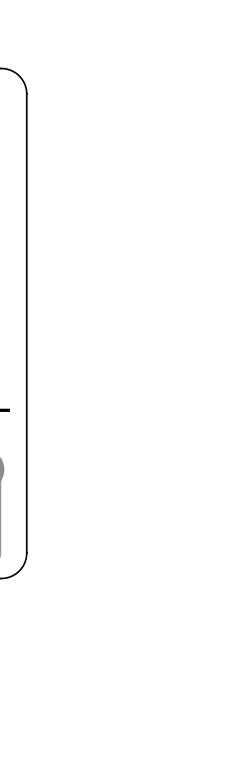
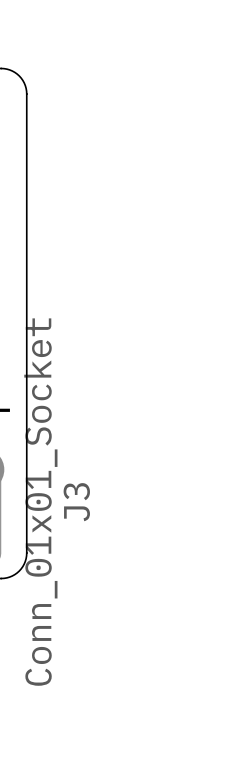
J3 value: none -> Conn_01x01_Socket (40, 502)
J3 name: none -> J3 (76, 502)

